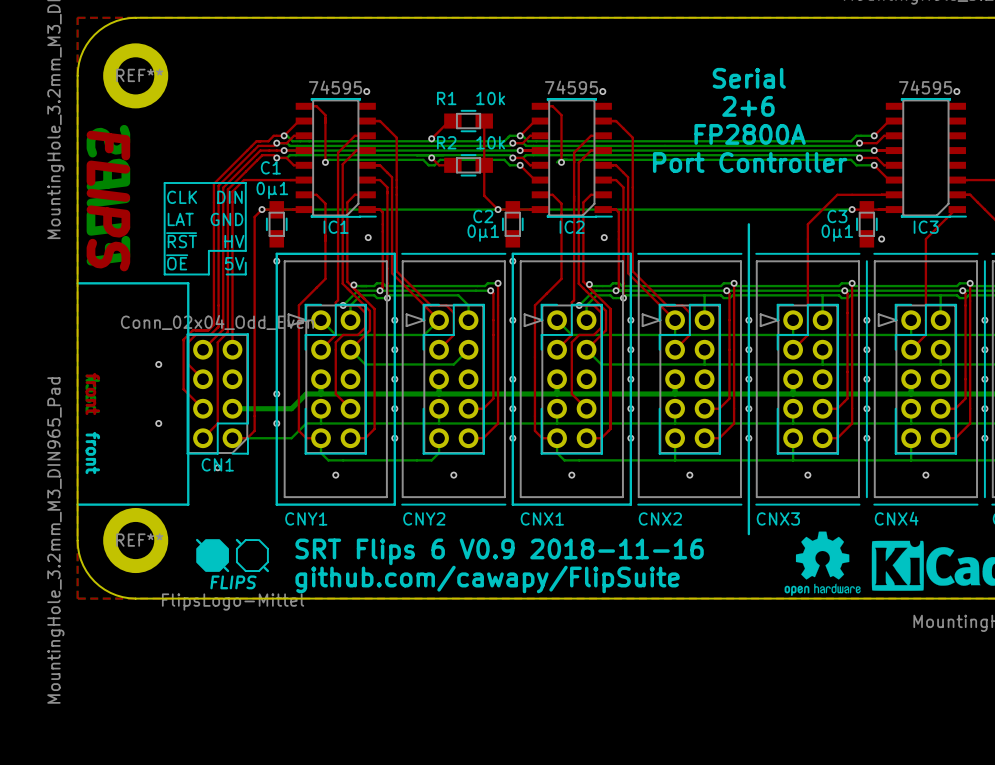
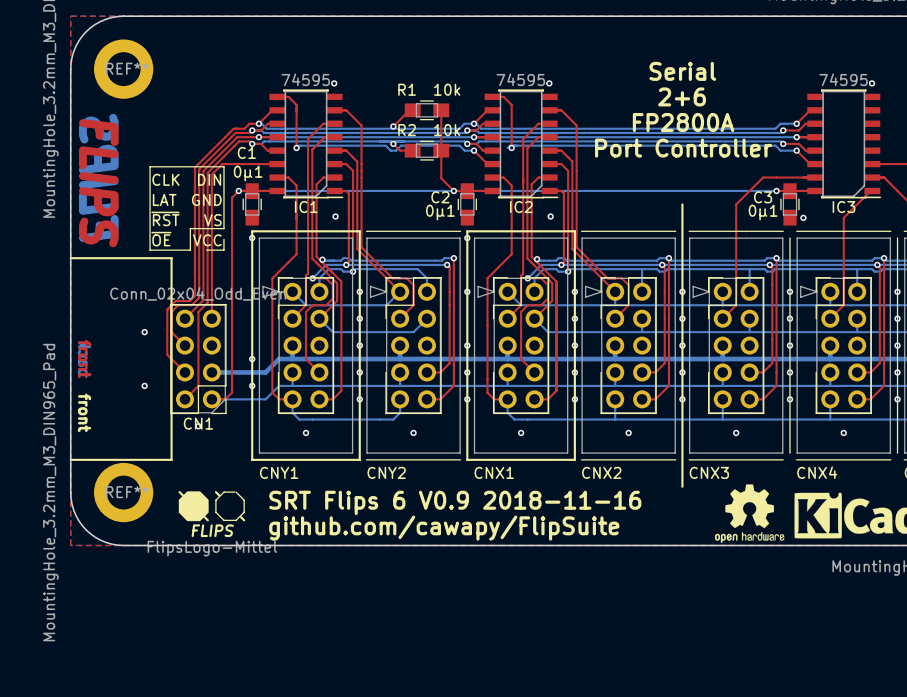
text: HV (234, 241) -> VS (212, 220)
text: 5V (234, 263) -> VCC (207, 240)

